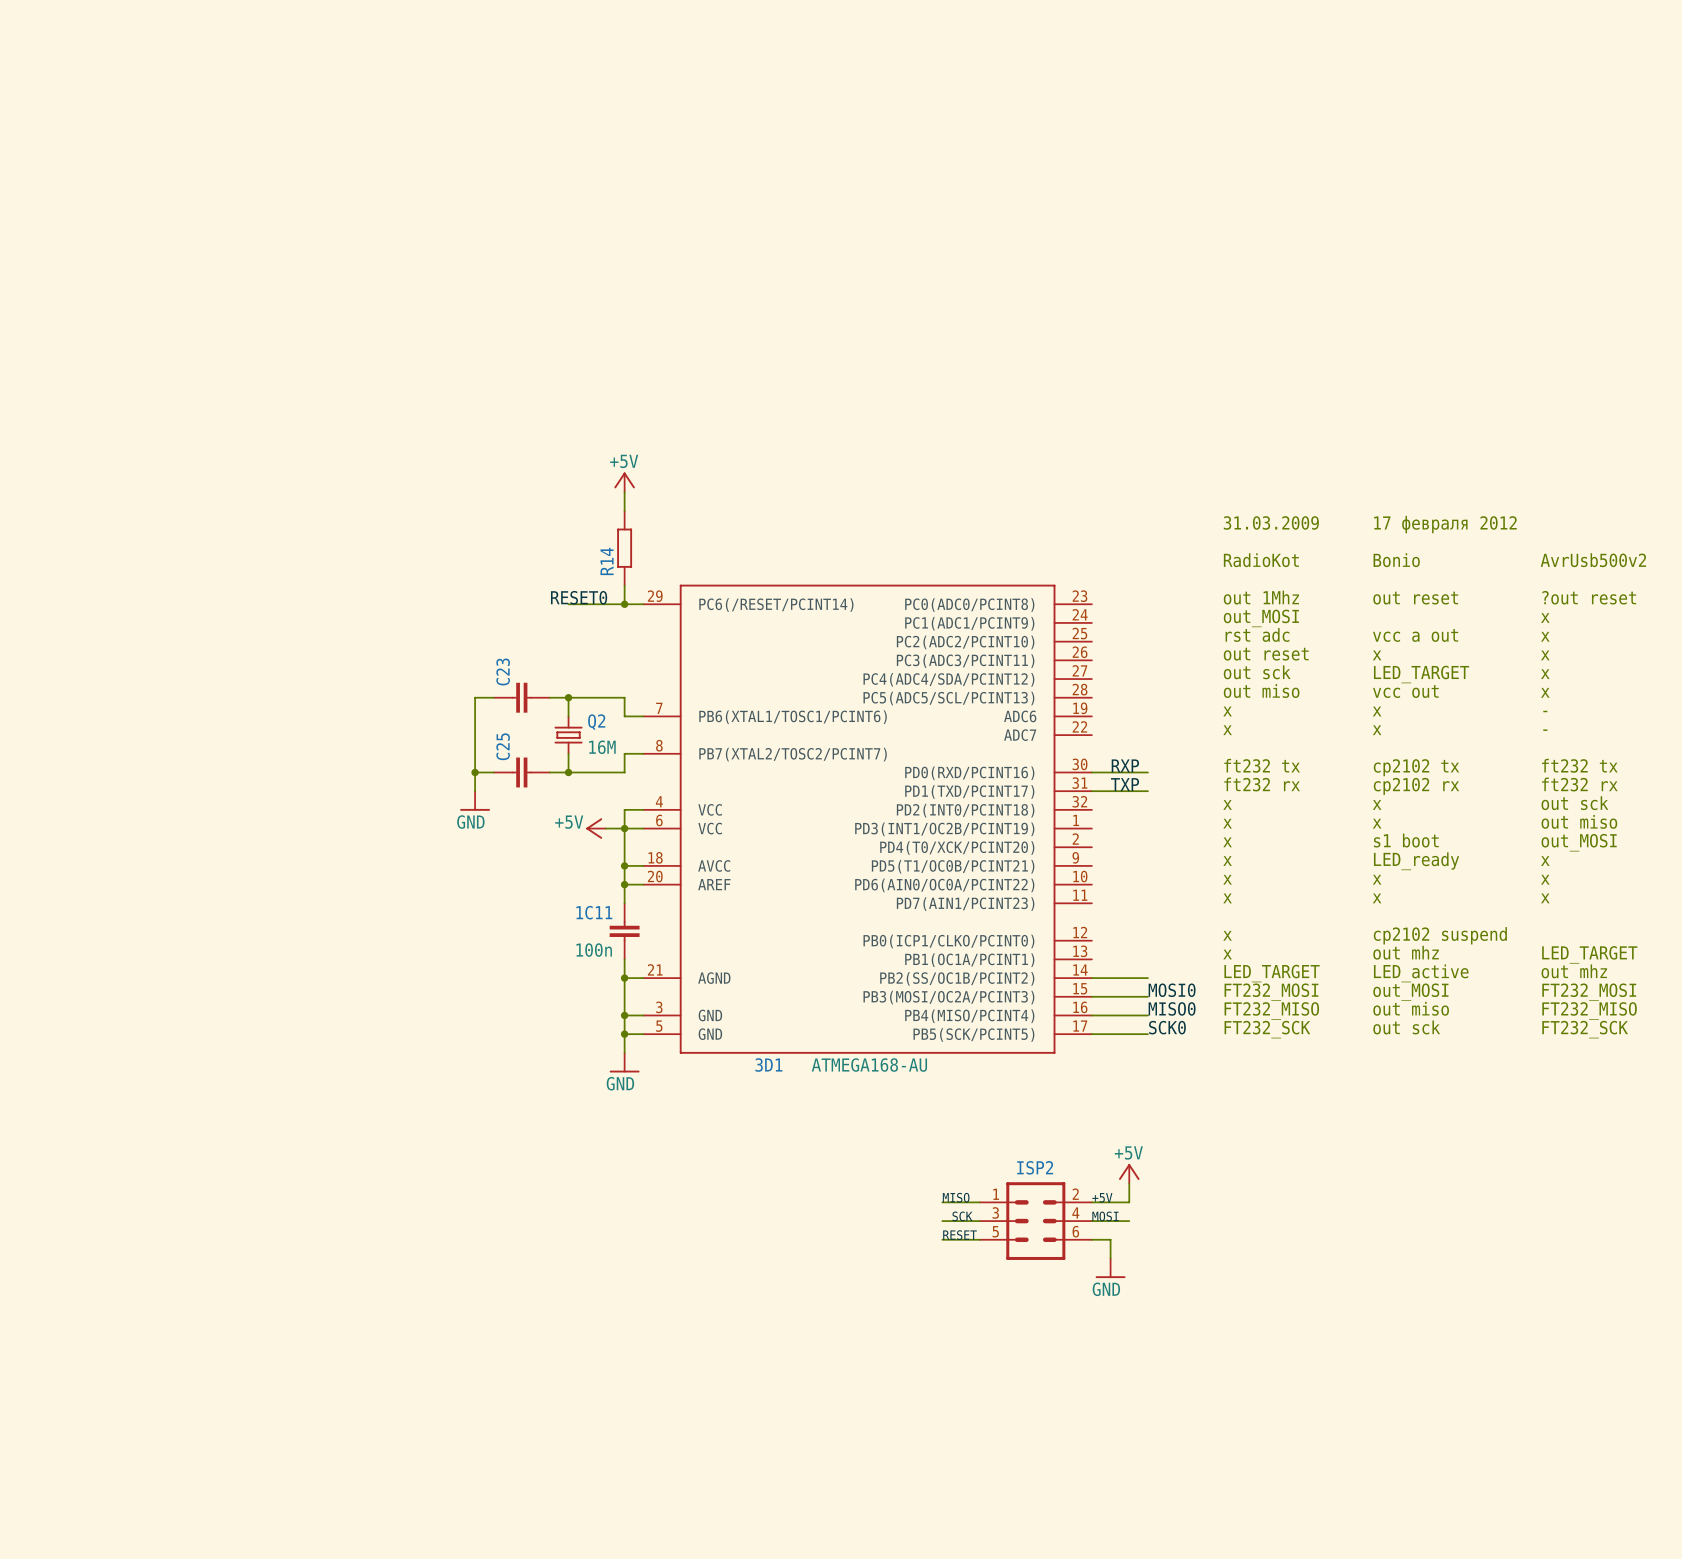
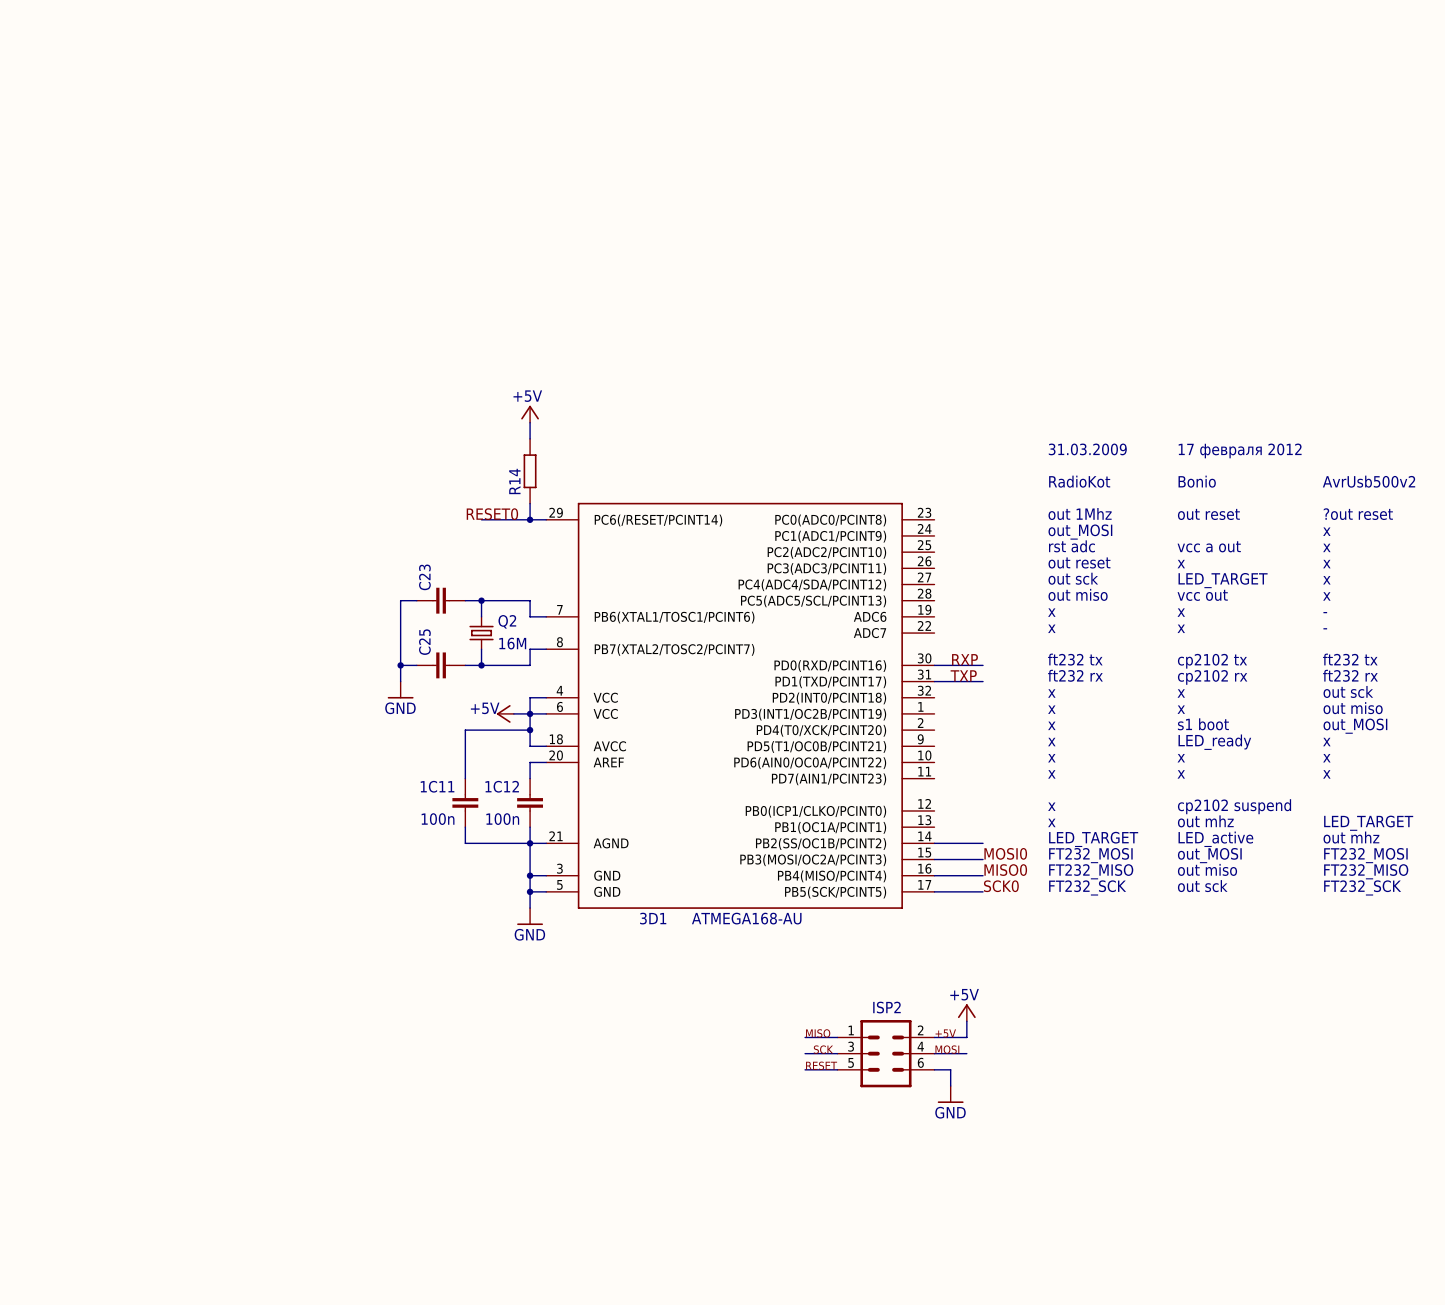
wire: none -> (530, 730) (465, 730) (465, 778)
junction: none -> (530, 730)
wire: (624, 865) (624, 884) -> none
junction: (624, 865) -> none
junction: (624, 884) -> none
1C11 name: 1C11 (594, 912) -> 1C12 (502, 786)
1C11: none -> 100n (465, 802)
wire: none -> (465, 827) (465, 843) (530, 843)

